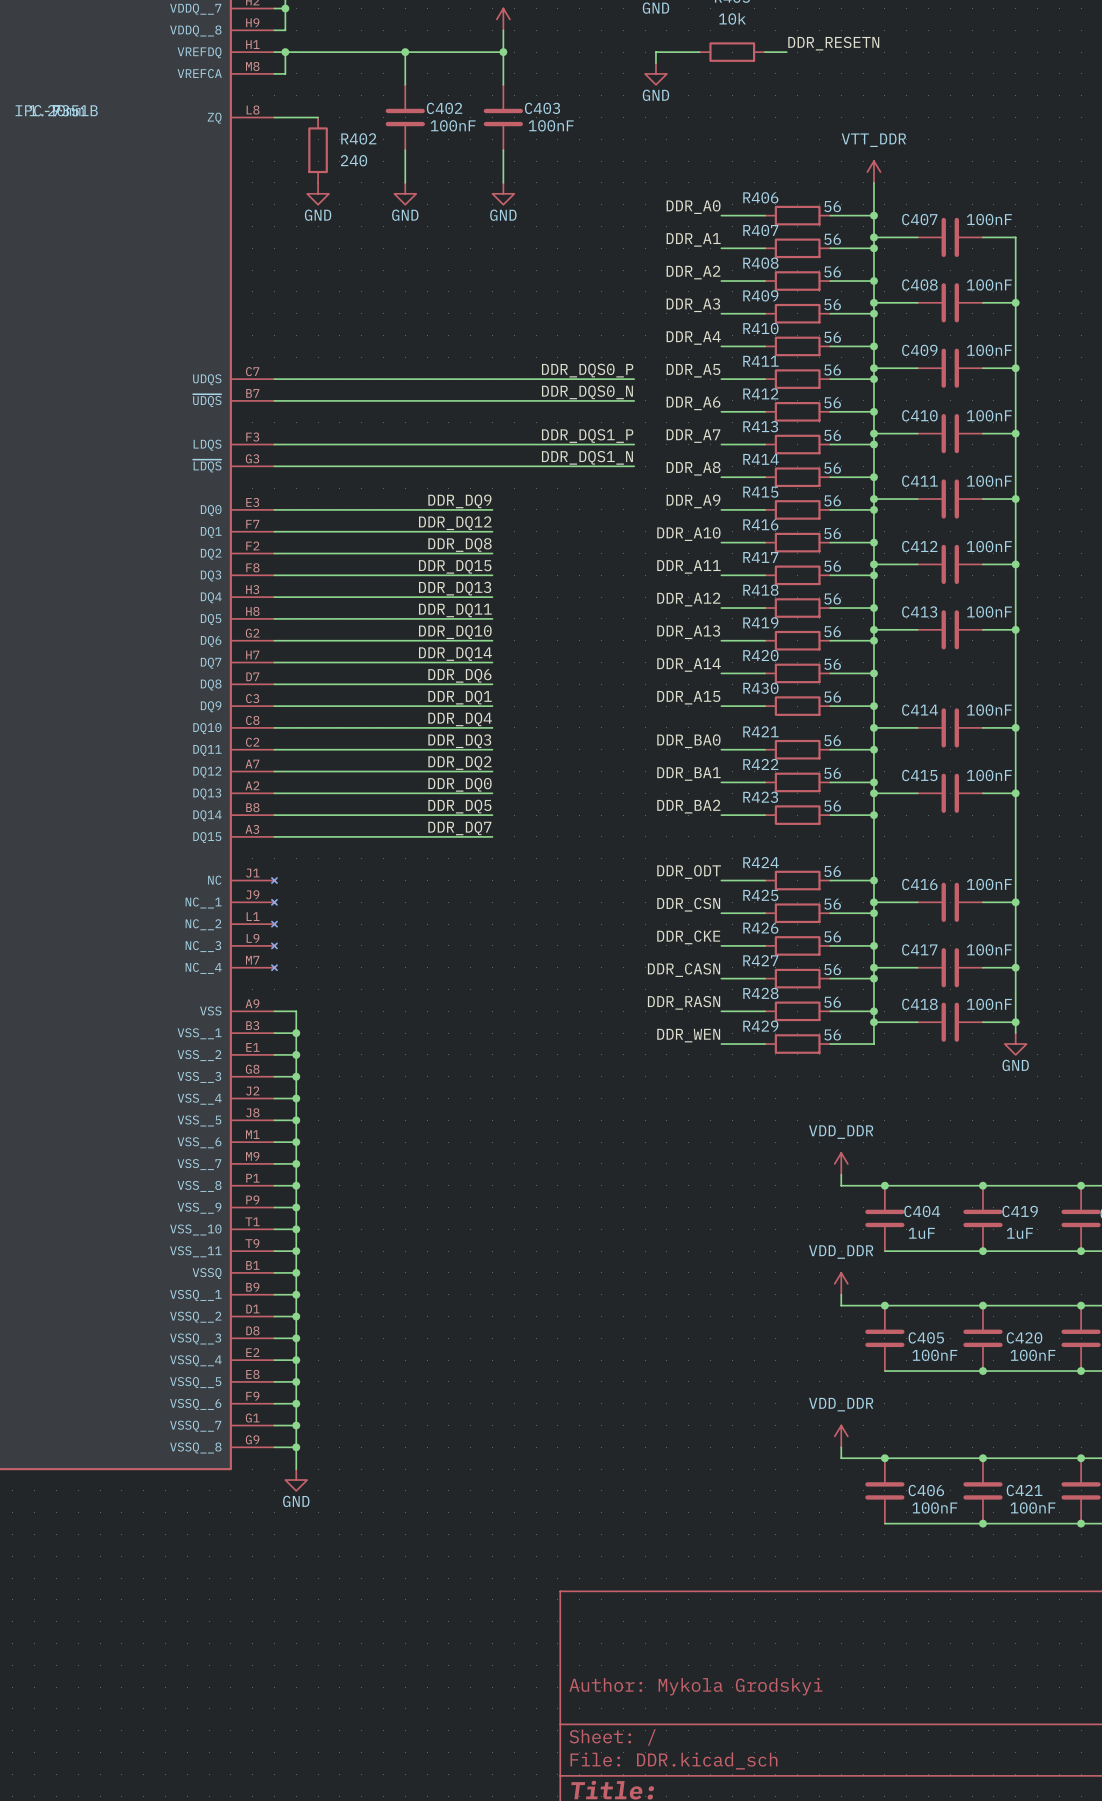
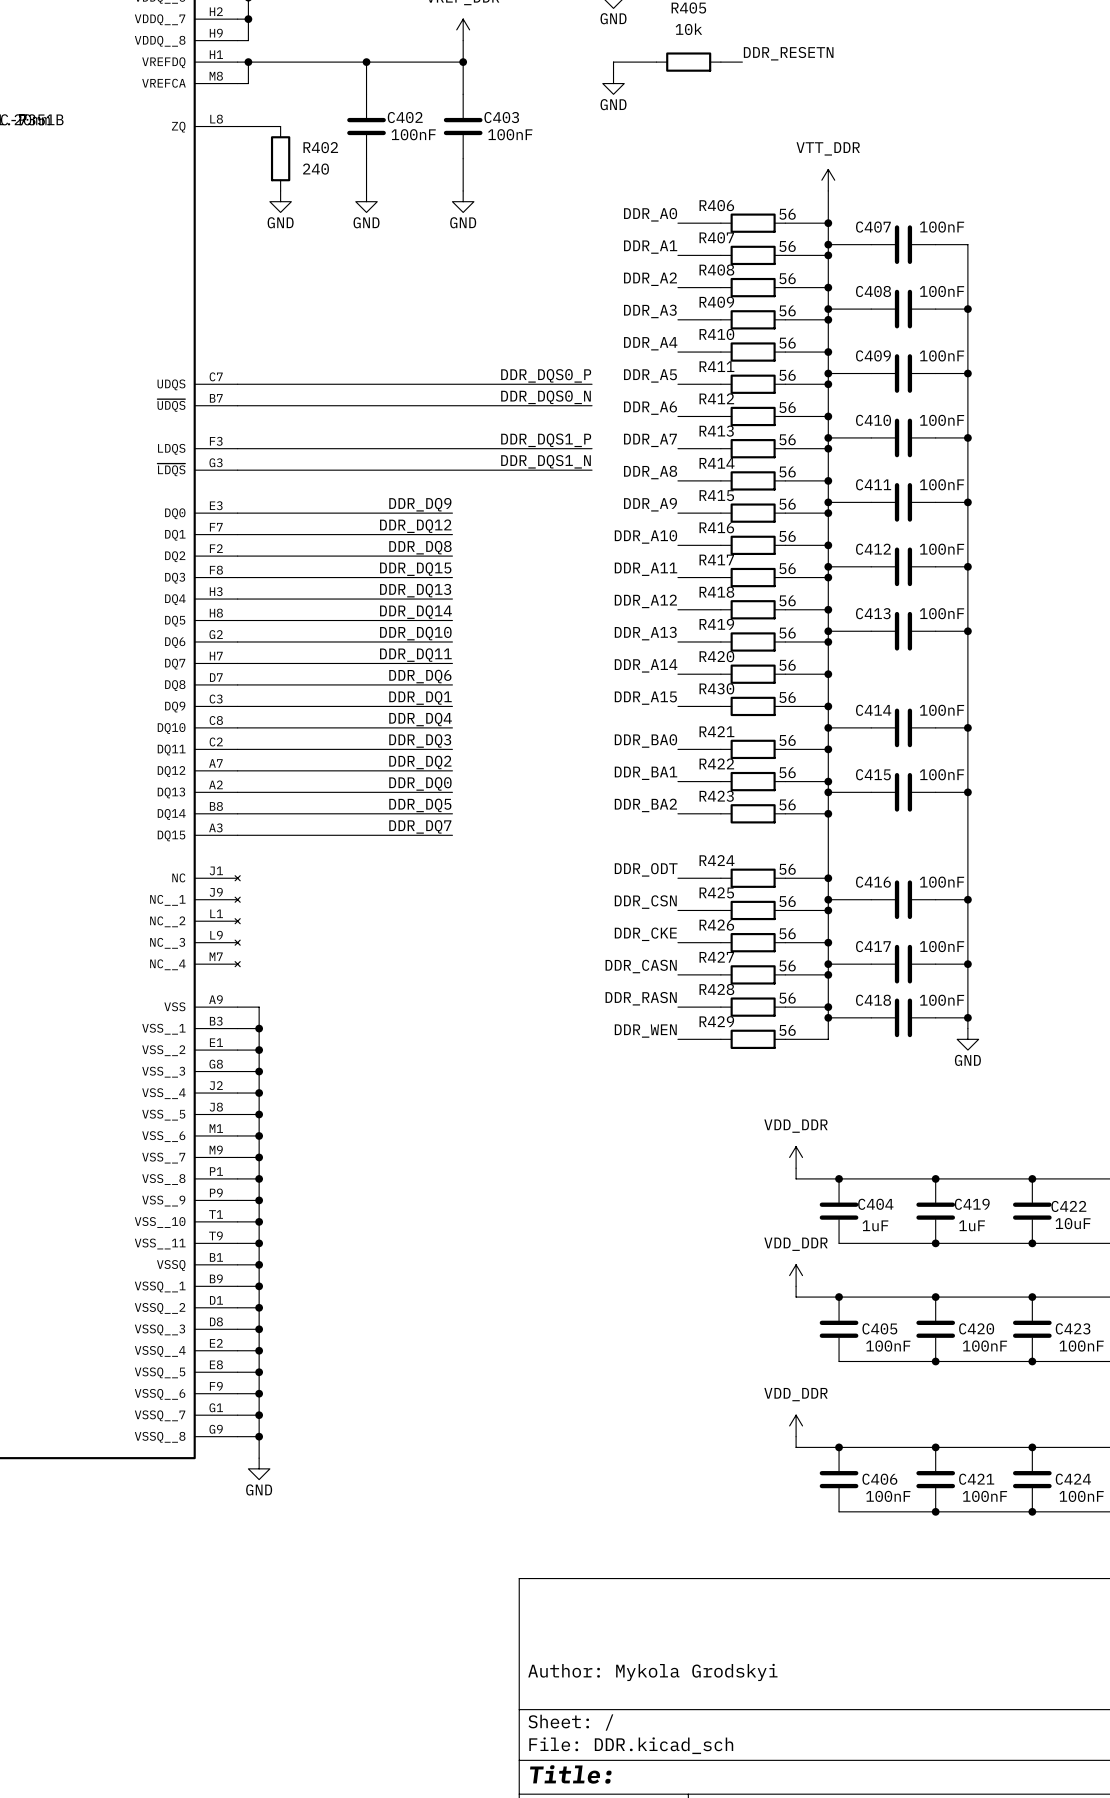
label: DDR_DQ11 (455, 610) -> DDR_DQ14 (415, 612)
label: DDR_DQ14 (455, 654) -> DDR_DQ11 (415, 655)

